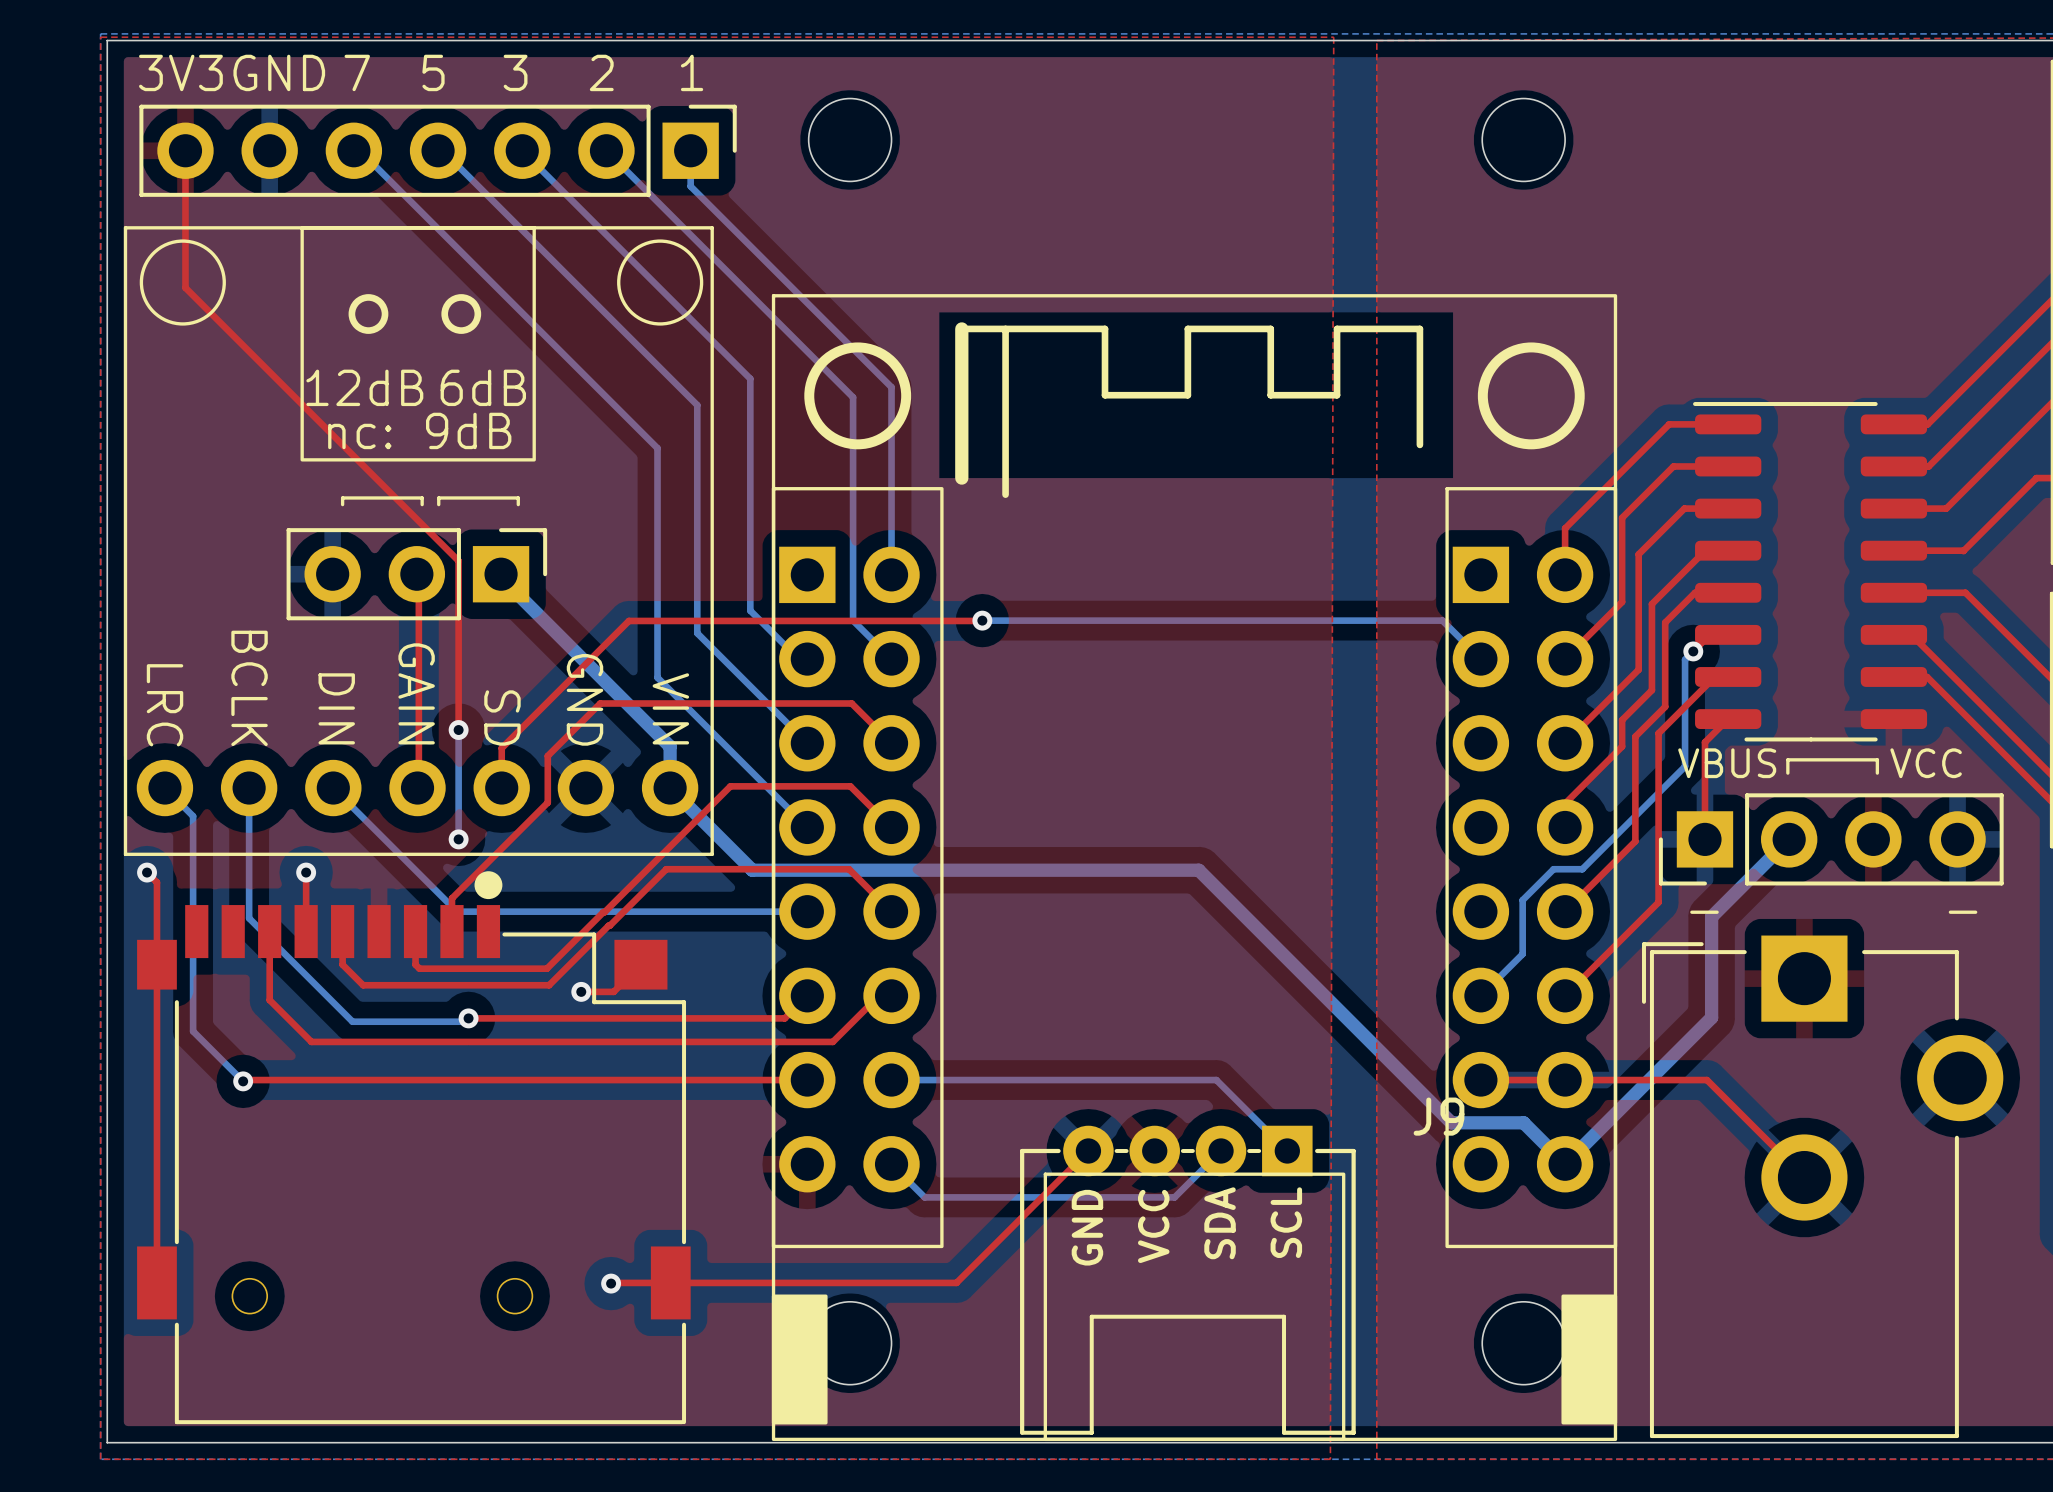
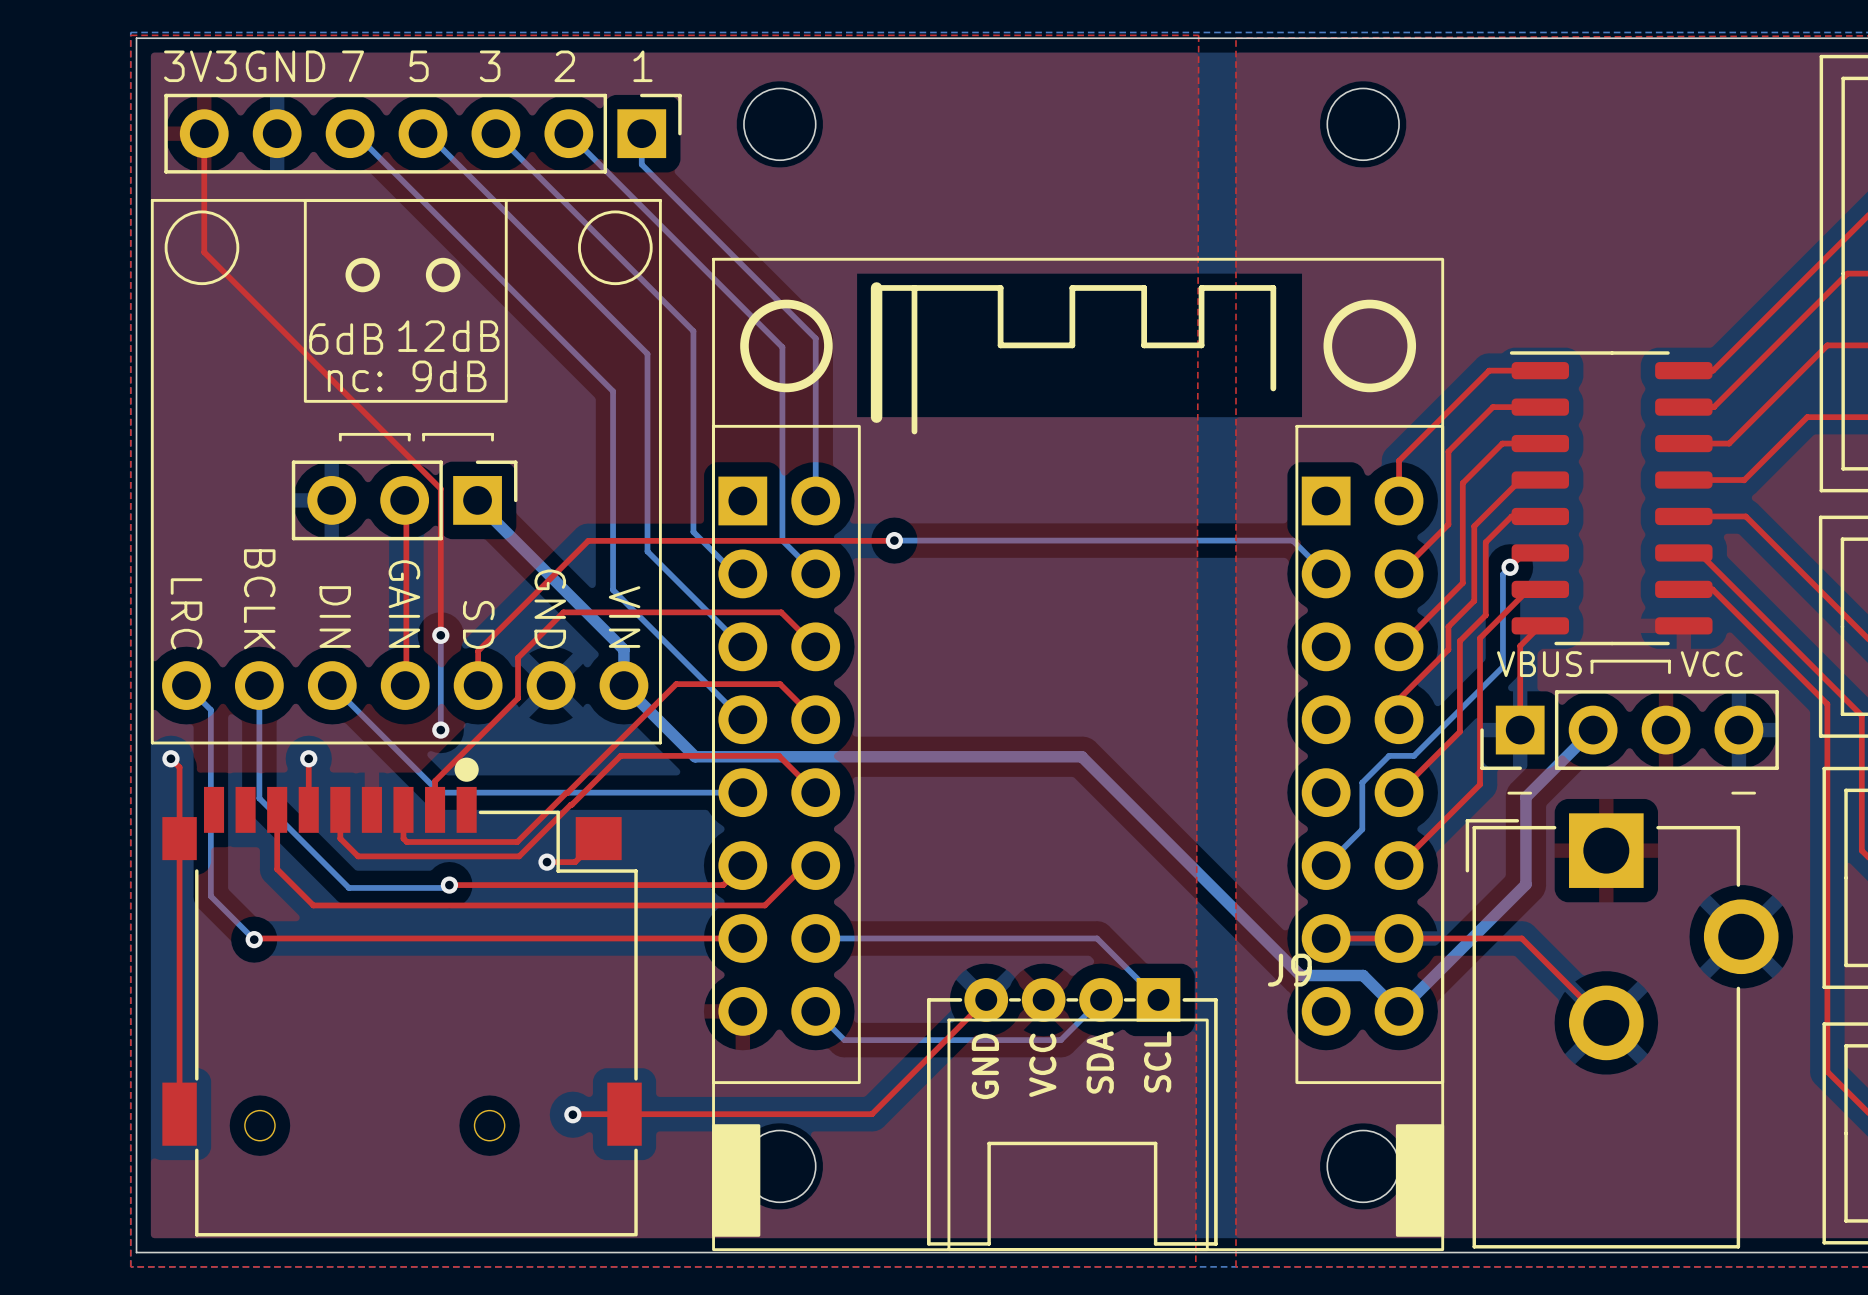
text: 12dB (364, 387) -> 6dB (346, 339)
text: 6dB (483, 387) -> 12dB (448, 336)

